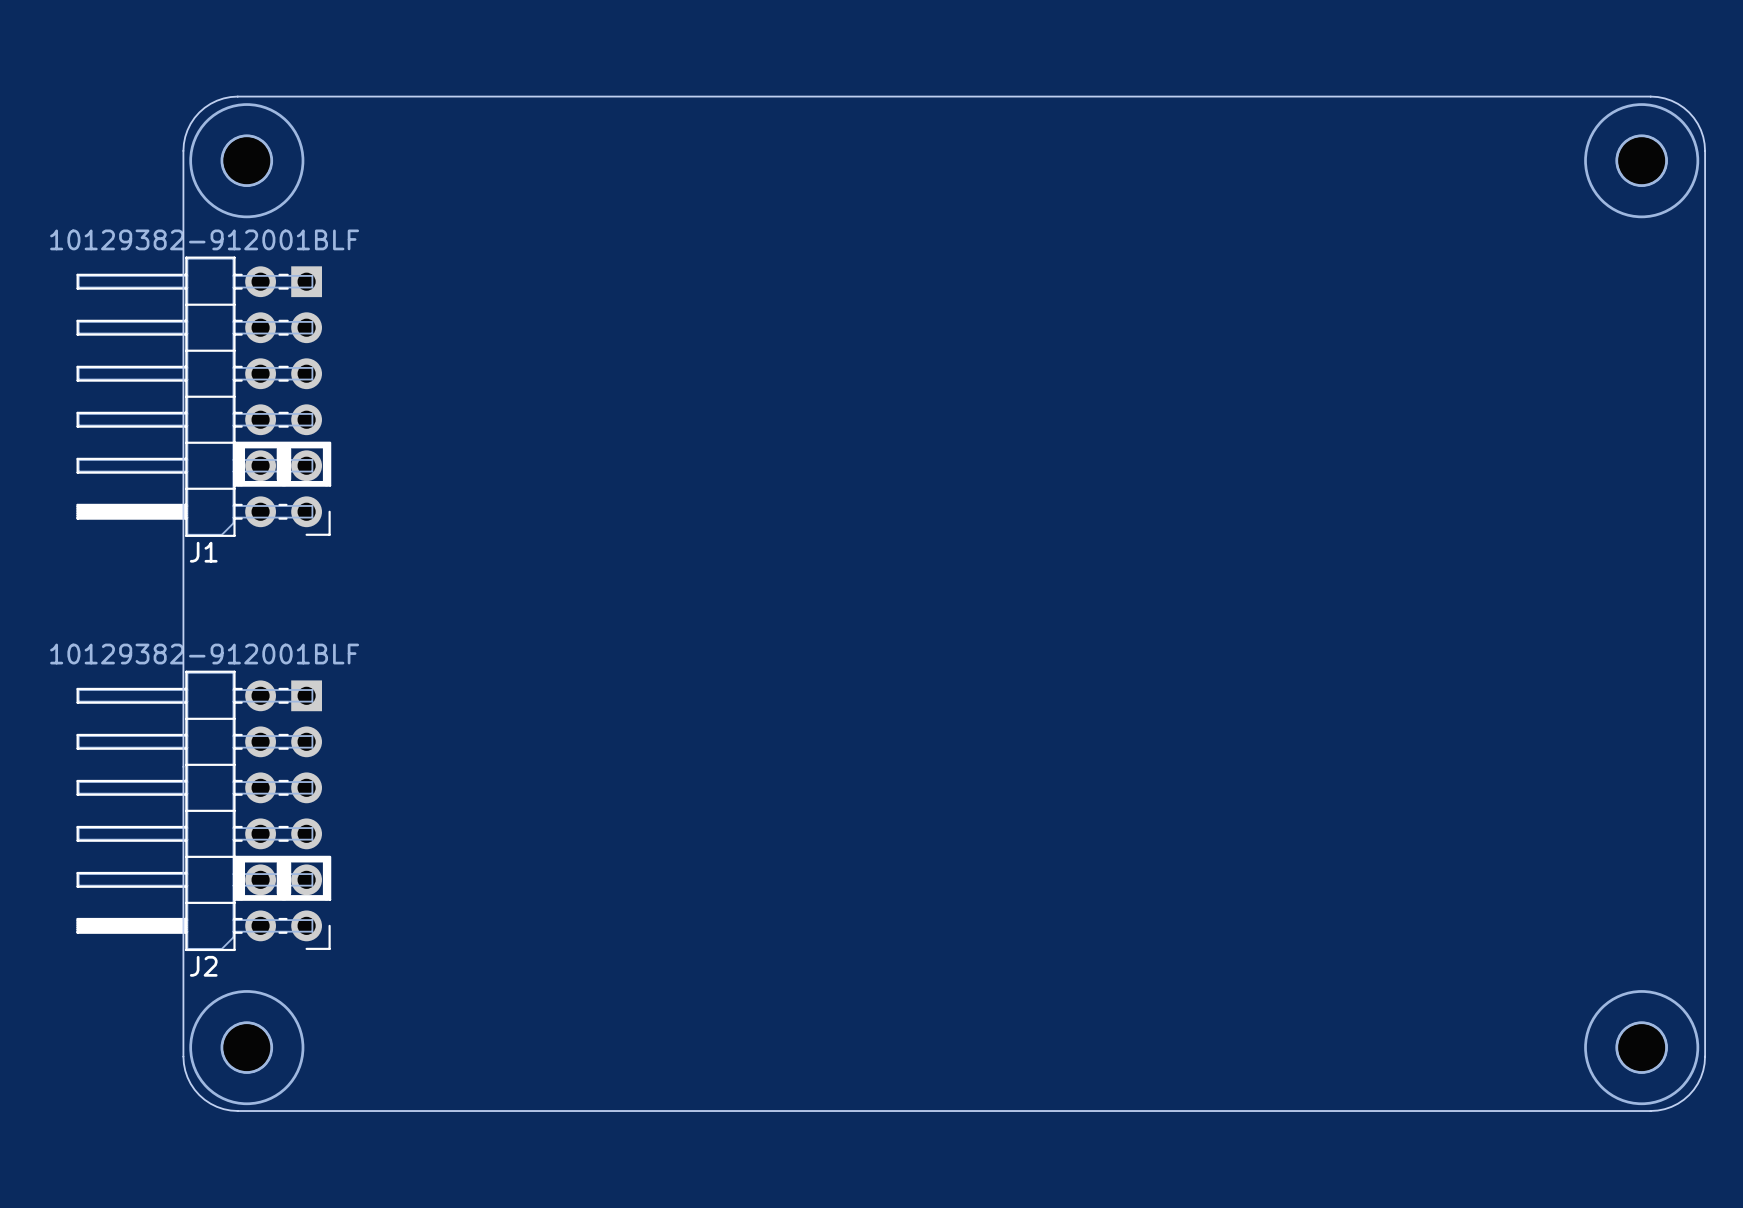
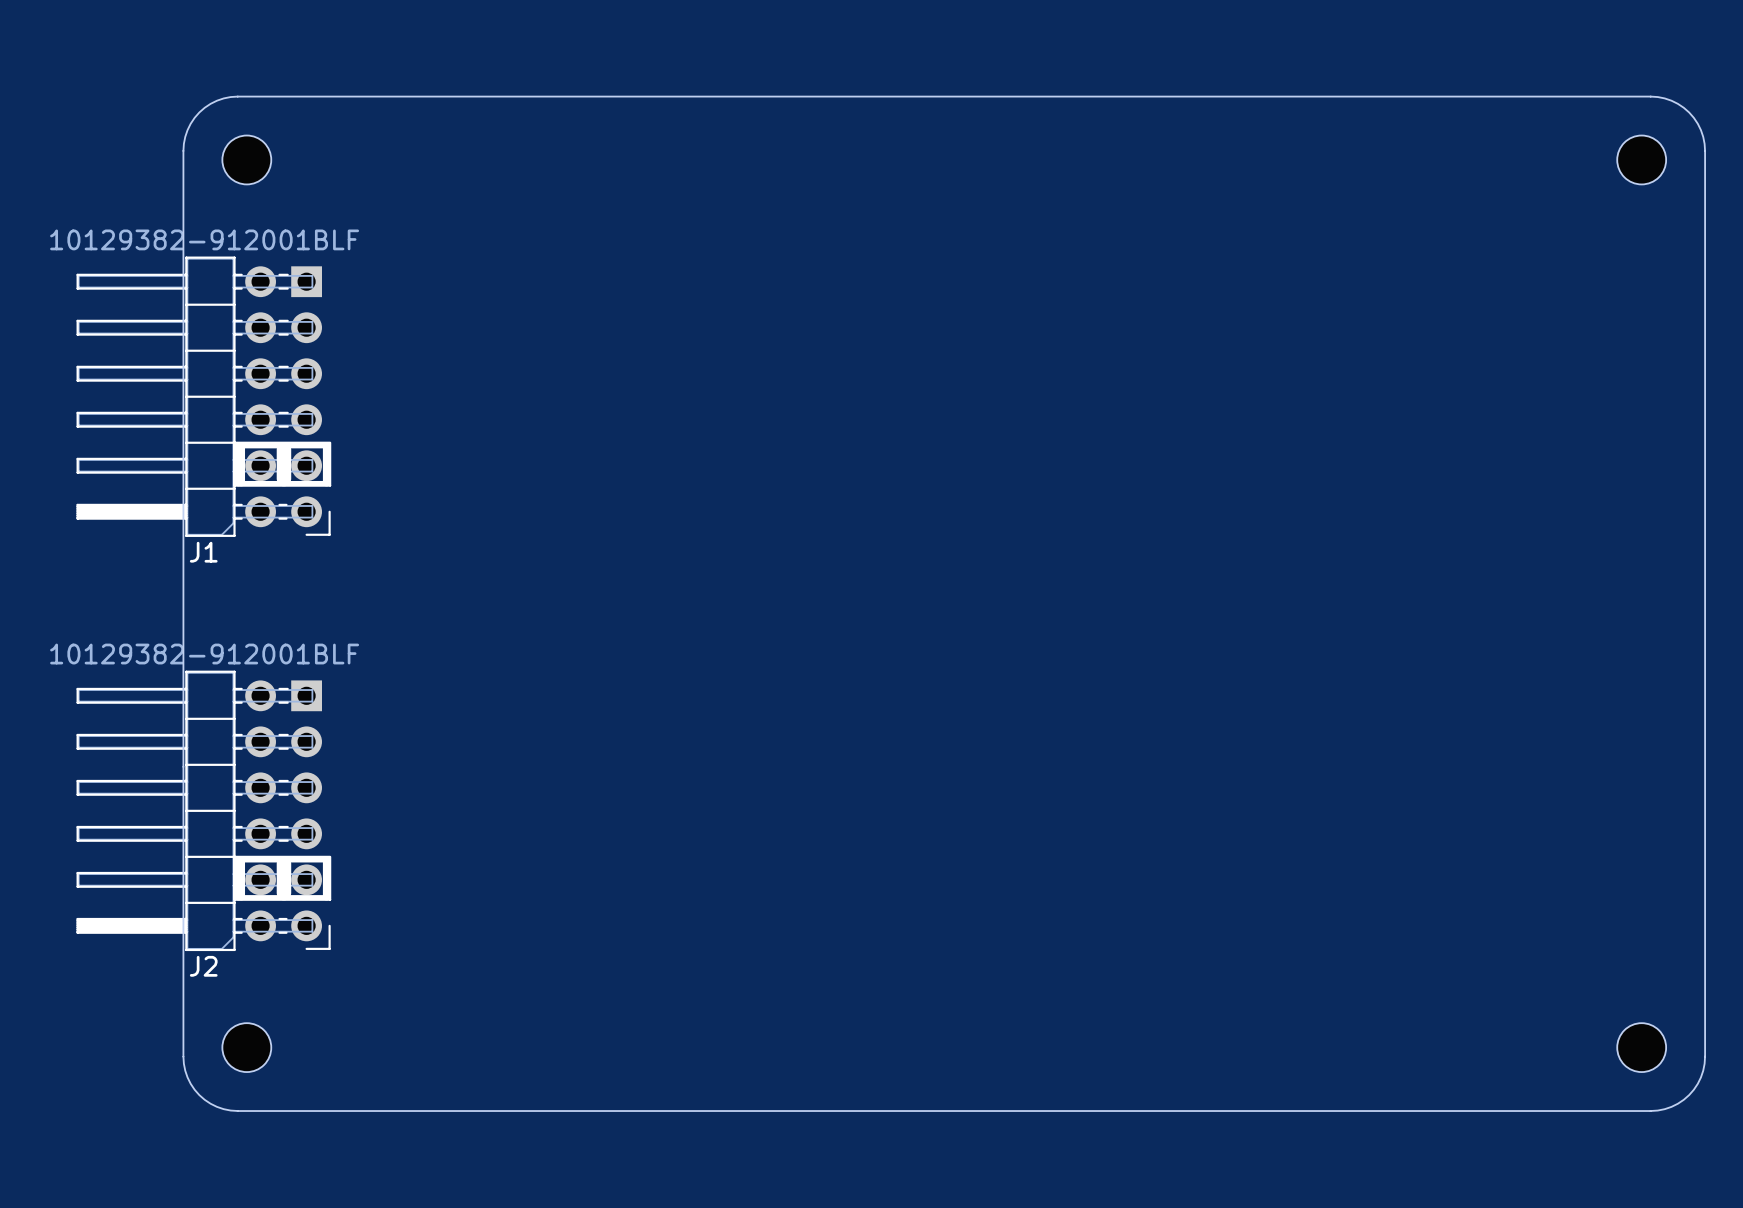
part footprint: [189, 103, 305, 219] -> [222, 135, 272, 185]
part footprint: [1584, 103, 1700, 219] -> [1617, 135, 1667, 185]
part footprint: [189, 990, 305, 1106] -> [222, 1023, 272, 1073]
part footprint: [1584, 990, 1700, 1106] -> [1617, 1023, 1667, 1073]

